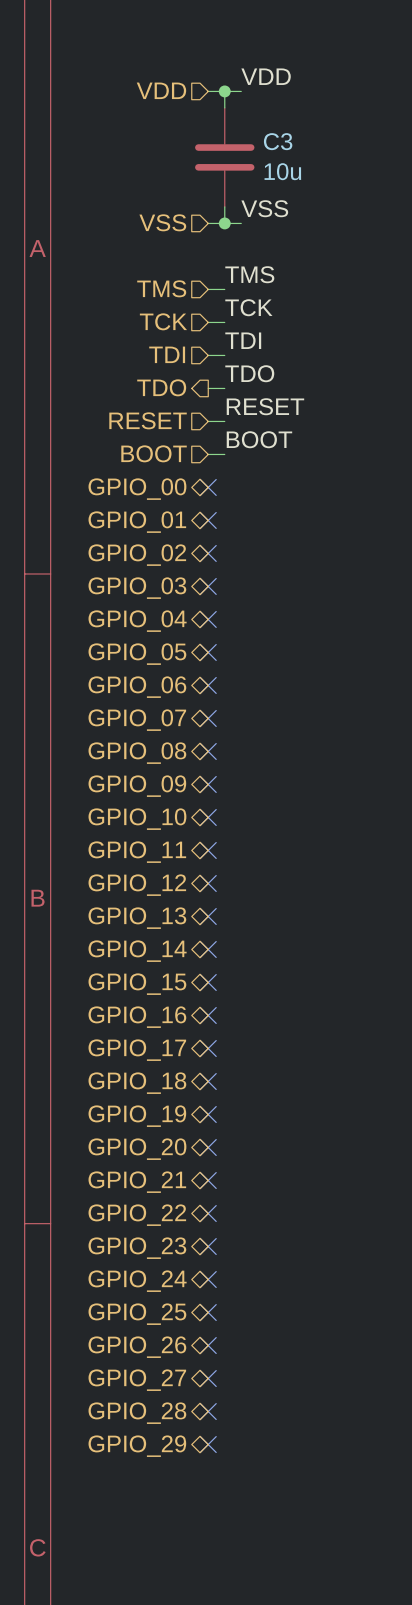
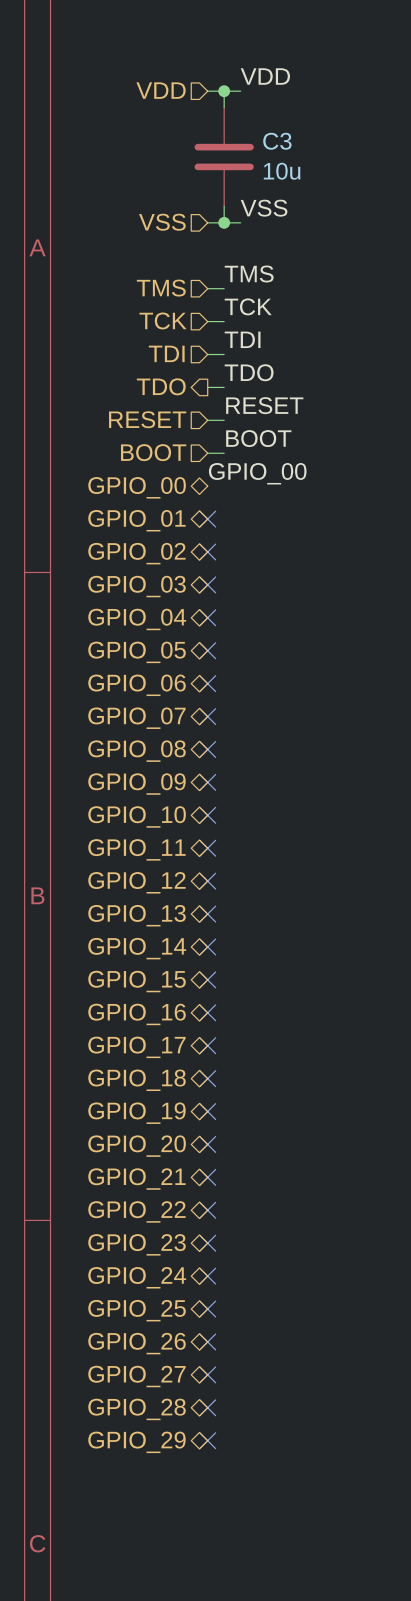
label: none -> GPIO_00 (257, 473)
no-connect mark: (208, 487) -> none

